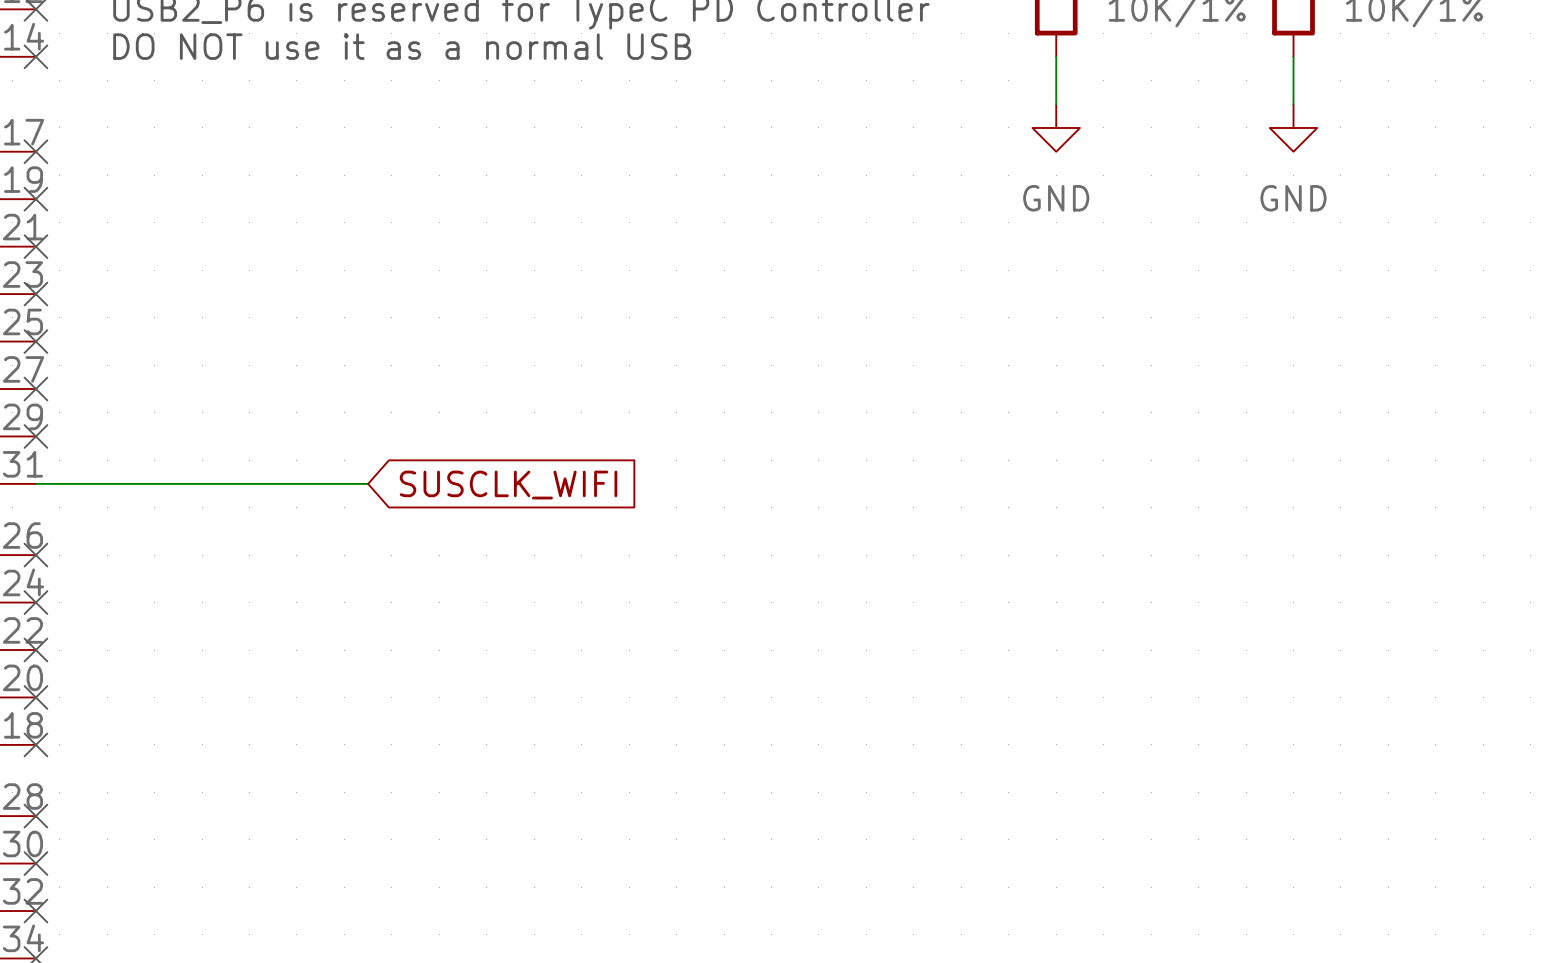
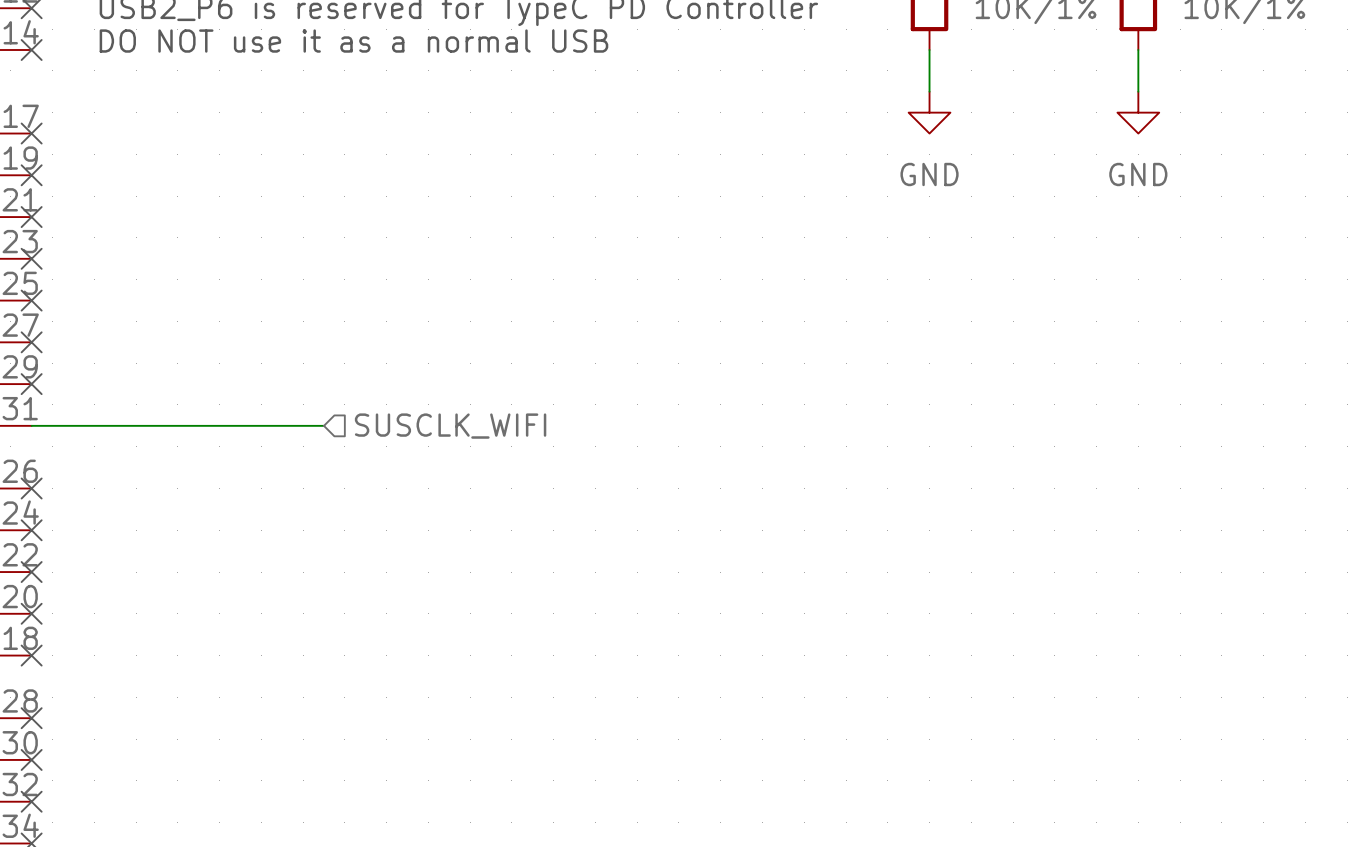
hierarchical label: none -> SUSCLK_WIFI (450, 426)
global label: SUSCLK_WIFI (508, 485) -> none

